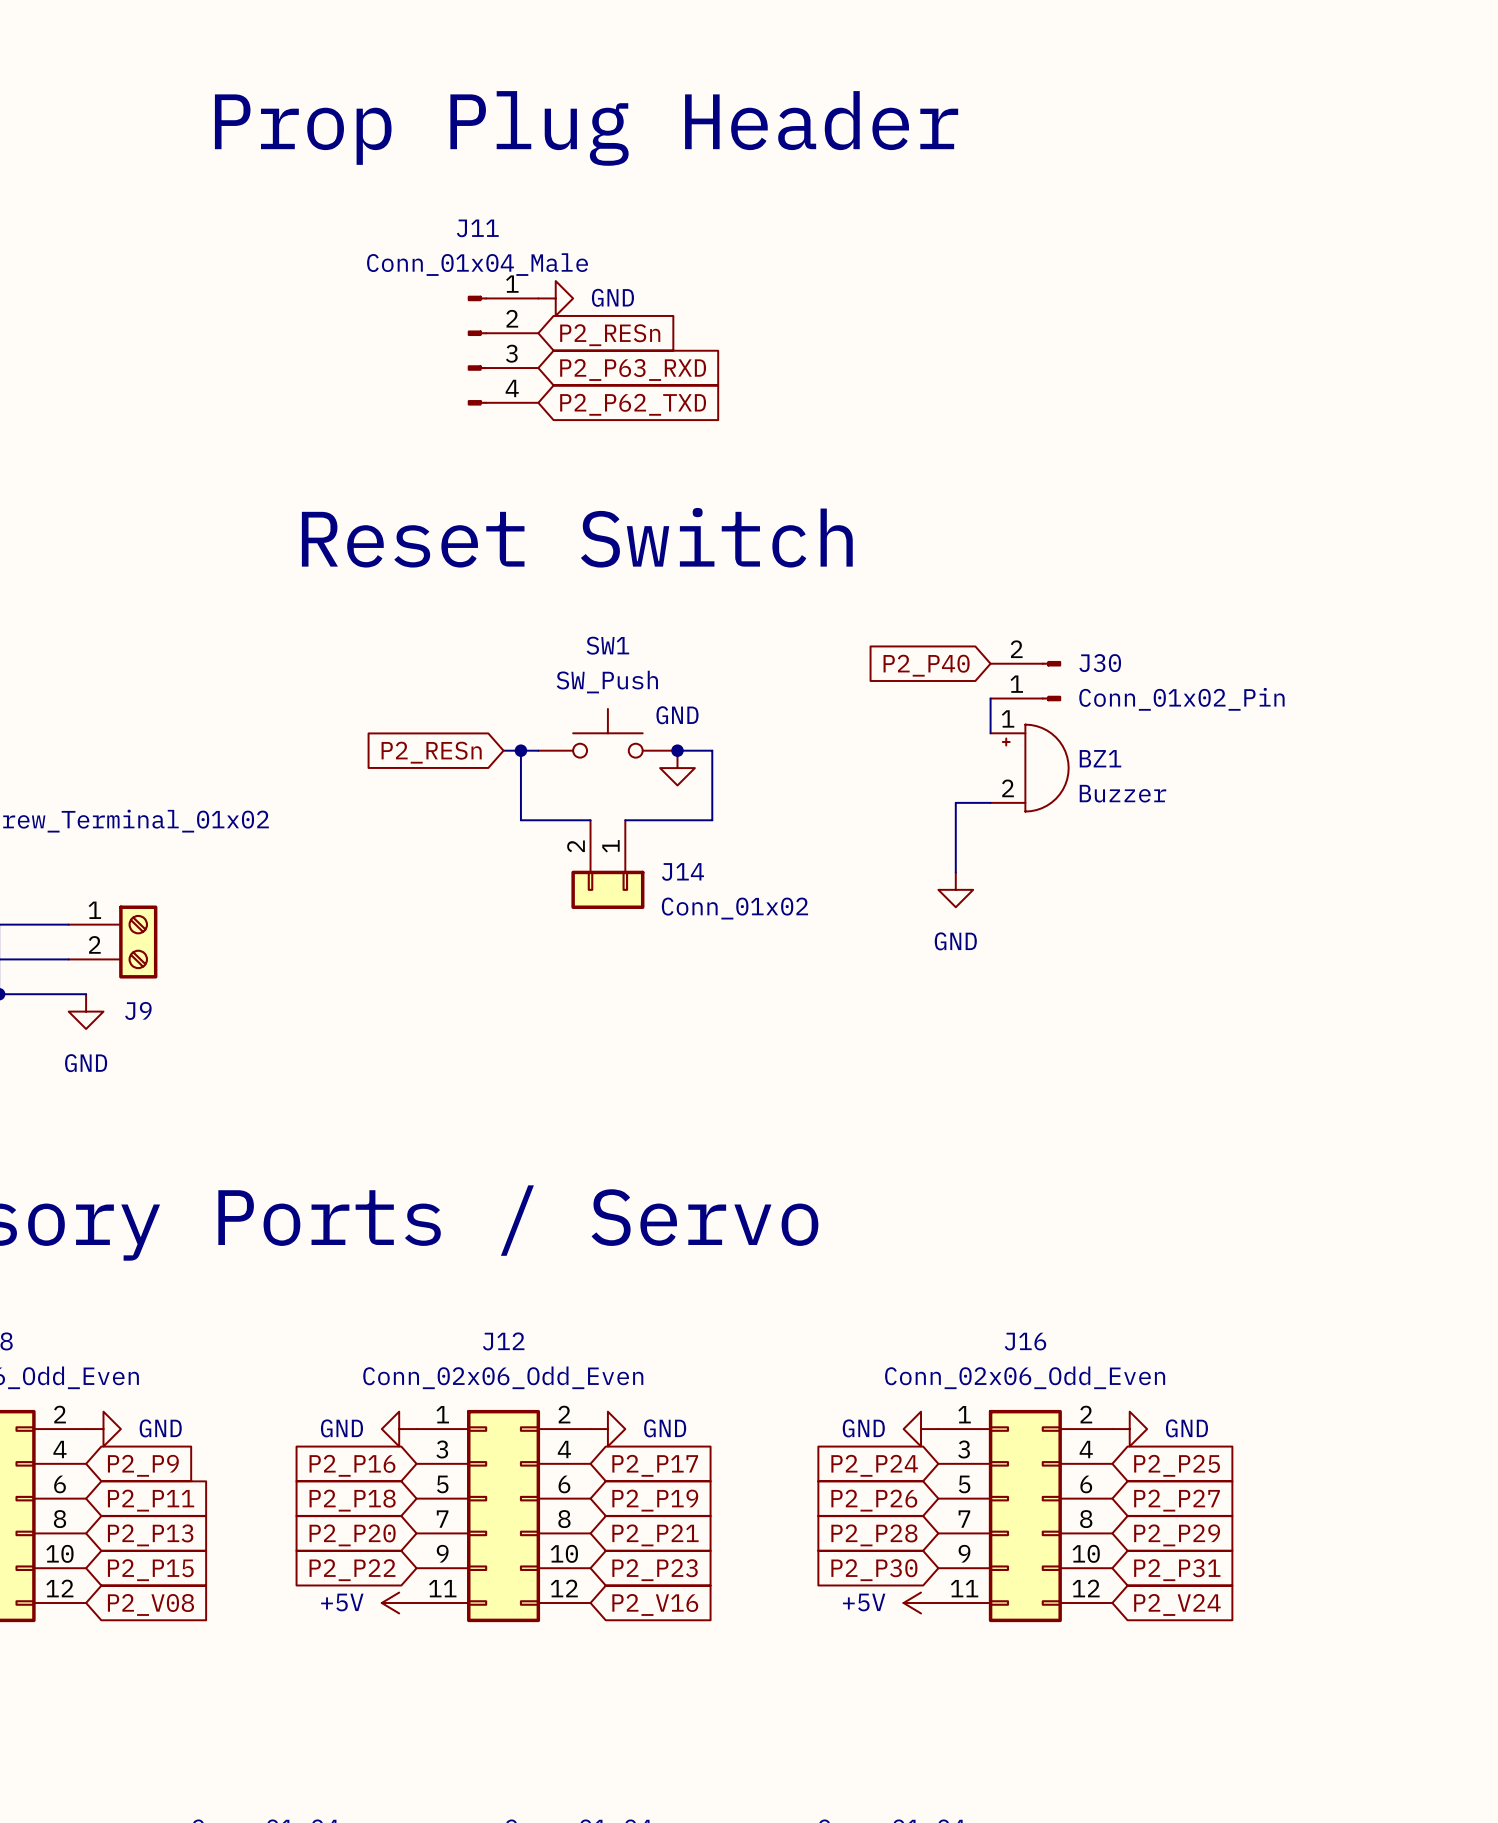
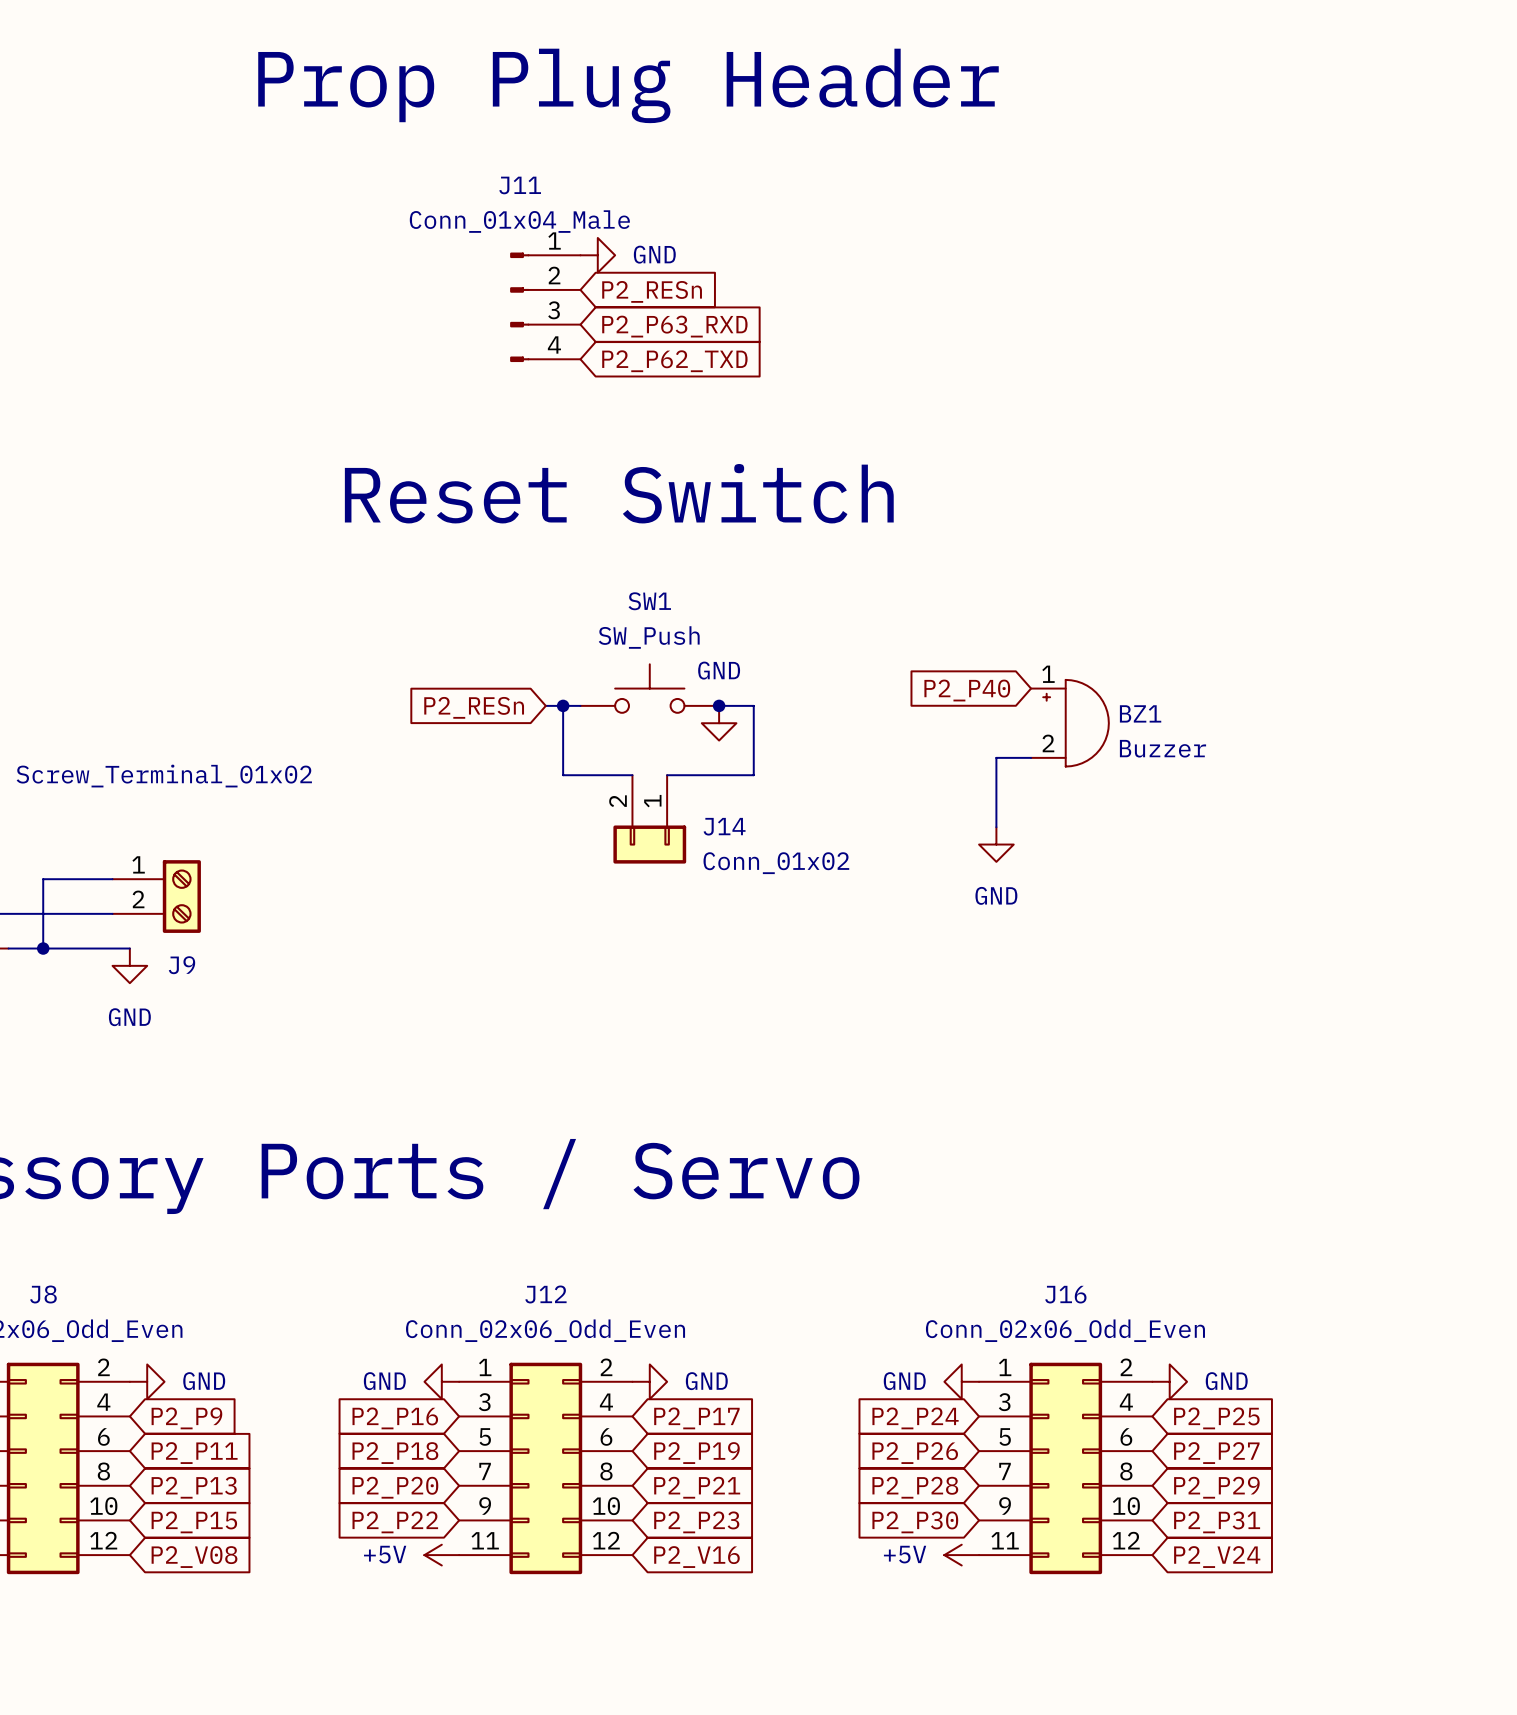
global label position: P2_P40 (926, 665) -> P2_P40 (967, 690)
J30: Conn_01x02_Pin (1025, 681) -> none
wire: (990, 698) (990, 733) -> none

